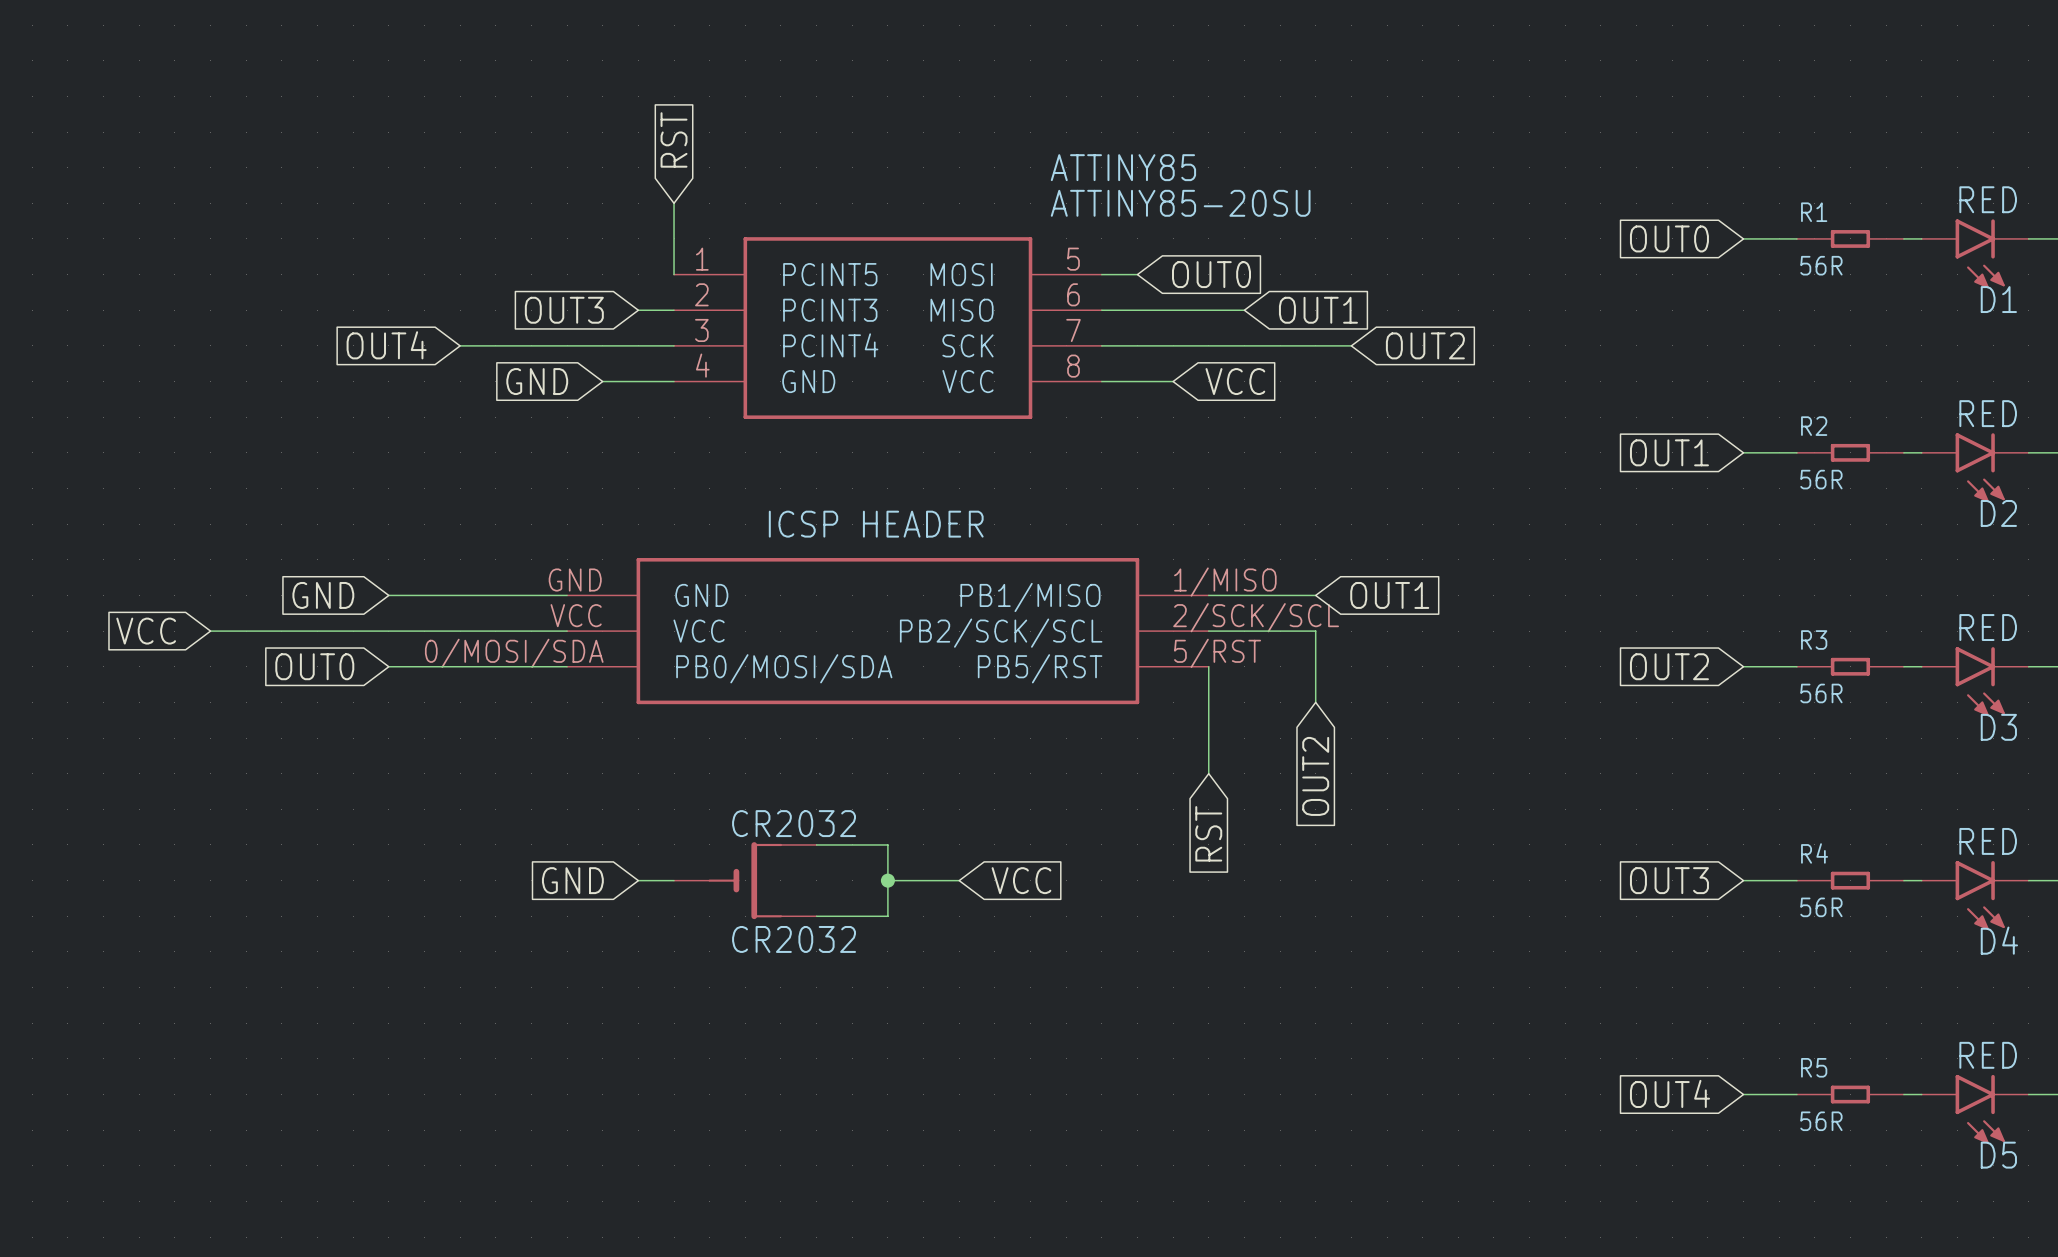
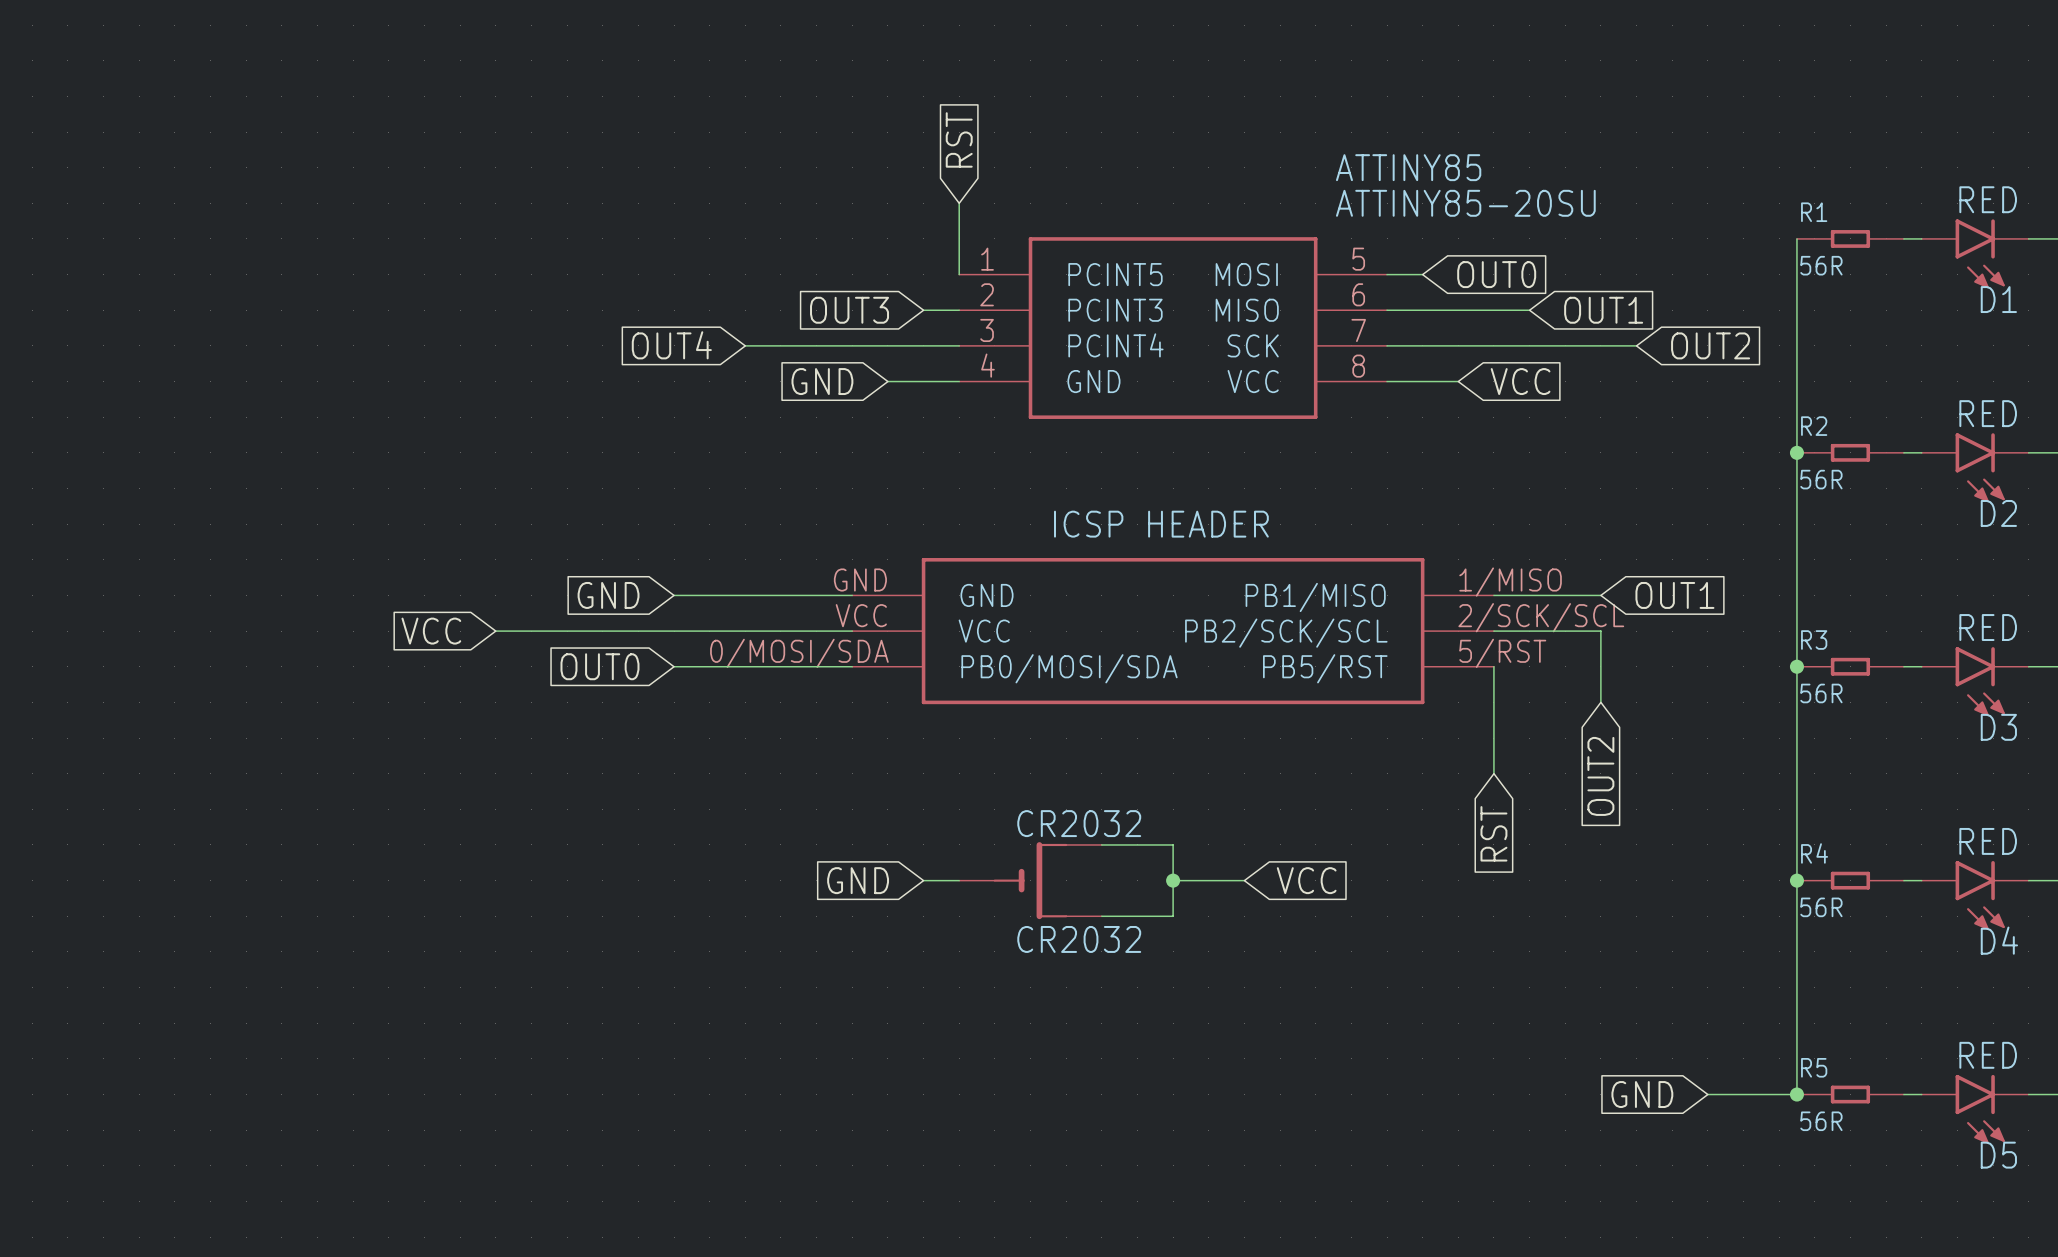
global label position: RST (674, 139) -> RST (959, 139)
wire: (674, 203) (674, 274) -> (959, 203) (959, 274)
global label: OUT0 (1669, 238) -> none
wire: (1743, 238) (1796, 238) -> (1796, 1094) (1796, 238)
wire: (1101, 274) (1137, 274) -> (1387, 274) (1422, 274)
global label: OUT0 (1211, 274) -> none
global label: none -> OUT0 (1496, 274)
global label position: OUT3 (564, 310) -> OUT3 (849, 310)
wire: (638, 310) (674, 310) -> (923, 310) (959, 310)
wire: (1101, 310) (1244, 310) -> (1387, 310) (1529, 310)
global label: OUT1 (1318, 310) -> none
global label: none -> OUT1 (1603, 310)
ATTINY85 position: (887, 328) -> (1173, 328)
global label position: OUT4 (386, 345) -> OUT4 (671, 345)
wire: (460, 345) (674, 345) -> (745, 345) (959, 345)
wire: (1101, 345) (1351, 345) -> (1387, 345) (1636, 345)
global label: OUT2 (1425, 345) -> none
global label: none -> OUT2 (1710, 345)
global label: GND (537, 381) -> none
wire: (602, 381) (674, 381) -> (887, 381) (959, 381)
global label: none -> GND (822, 381)
wire: (1101, 381) (1173, 381) -> (1387, 381) (1458, 381)
global label: VCC (1235, 381) -> none
global label: none -> VCC (1520, 381)
global label: OUT1 (1669, 452) -> none
wire: (1743, 452) (1796, 452) -> none
junction: none -> (1796, 452)
global label: GND (323, 595) -> none
wire: (388, 595) (567, 595) -> (674, 595) (852, 595)
global label: none -> GND (608, 595)
wire: (1208, 595) (1315, 595) -> (1493, 595) (1600, 595)
global label: OUT1 (1389, 595) -> none
global label: none -> OUT1 (1674, 595)
global label: VCC (146, 631) -> none
wire: (210, 631) (495, 631) -> none
global label: none -> VCC (431, 631)
wire: none -> (567, 631) (852, 631)
part position: (887, 631) -> (1173, 631)
wire: (1208, 631) (1315, 631) (1315, 702) -> (1493, 631) (1600, 631) (1600, 702)
global label position: OUT0 (314, 666) -> OUT0 (599, 666)
wire: (388, 666) (567, 666) -> (674, 666) (852, 666)
wire: (1208, 666) (1208, 773) -> (1493, 666) (1493, 773)
global label: OUT2 (1669, 666) -> none
wire: (1743, 666) (1796, 666) -> none
junction: none -> (1796, 666)
global label: OUT2 (1315, 776) -> none
global label position: RST (1208, 833) -> RST (1493, 833)
wire: (816, 844) (887, 844) (887, 916) (816, 916) -> (1101, 844) (1173, 844) (1173, 916) (1101, 916)
global label: GND (572, 880) -> none
wire: (638, 880) (674, 880) -> none
CR2032 position: (745, 880) -> (1030, 880)
global label: none -> GND (858, 880)
wire: (887, 880) (923, 880) -> none
junction: (887, 880) -> none
global label: VCC (1021, 880) -> none
wire: none -> (1173, 880) (1244, 880)
junction: none -> (1173, 880)
global label: none -> VCC (1306, 880)
global label: OUT3 (1669, 880) -> OUT2 (1600, 776)
wire: (1743, 880) (1796, 880) -> none
junction: none -> (1796, 880)
global label: OUT4 (1669, 1093) -> none
global label: none -> GND (1642, 1094)
wire: none -> (1707, 1094) (1743, 1094)
junction: none -> (1796, 1094)

